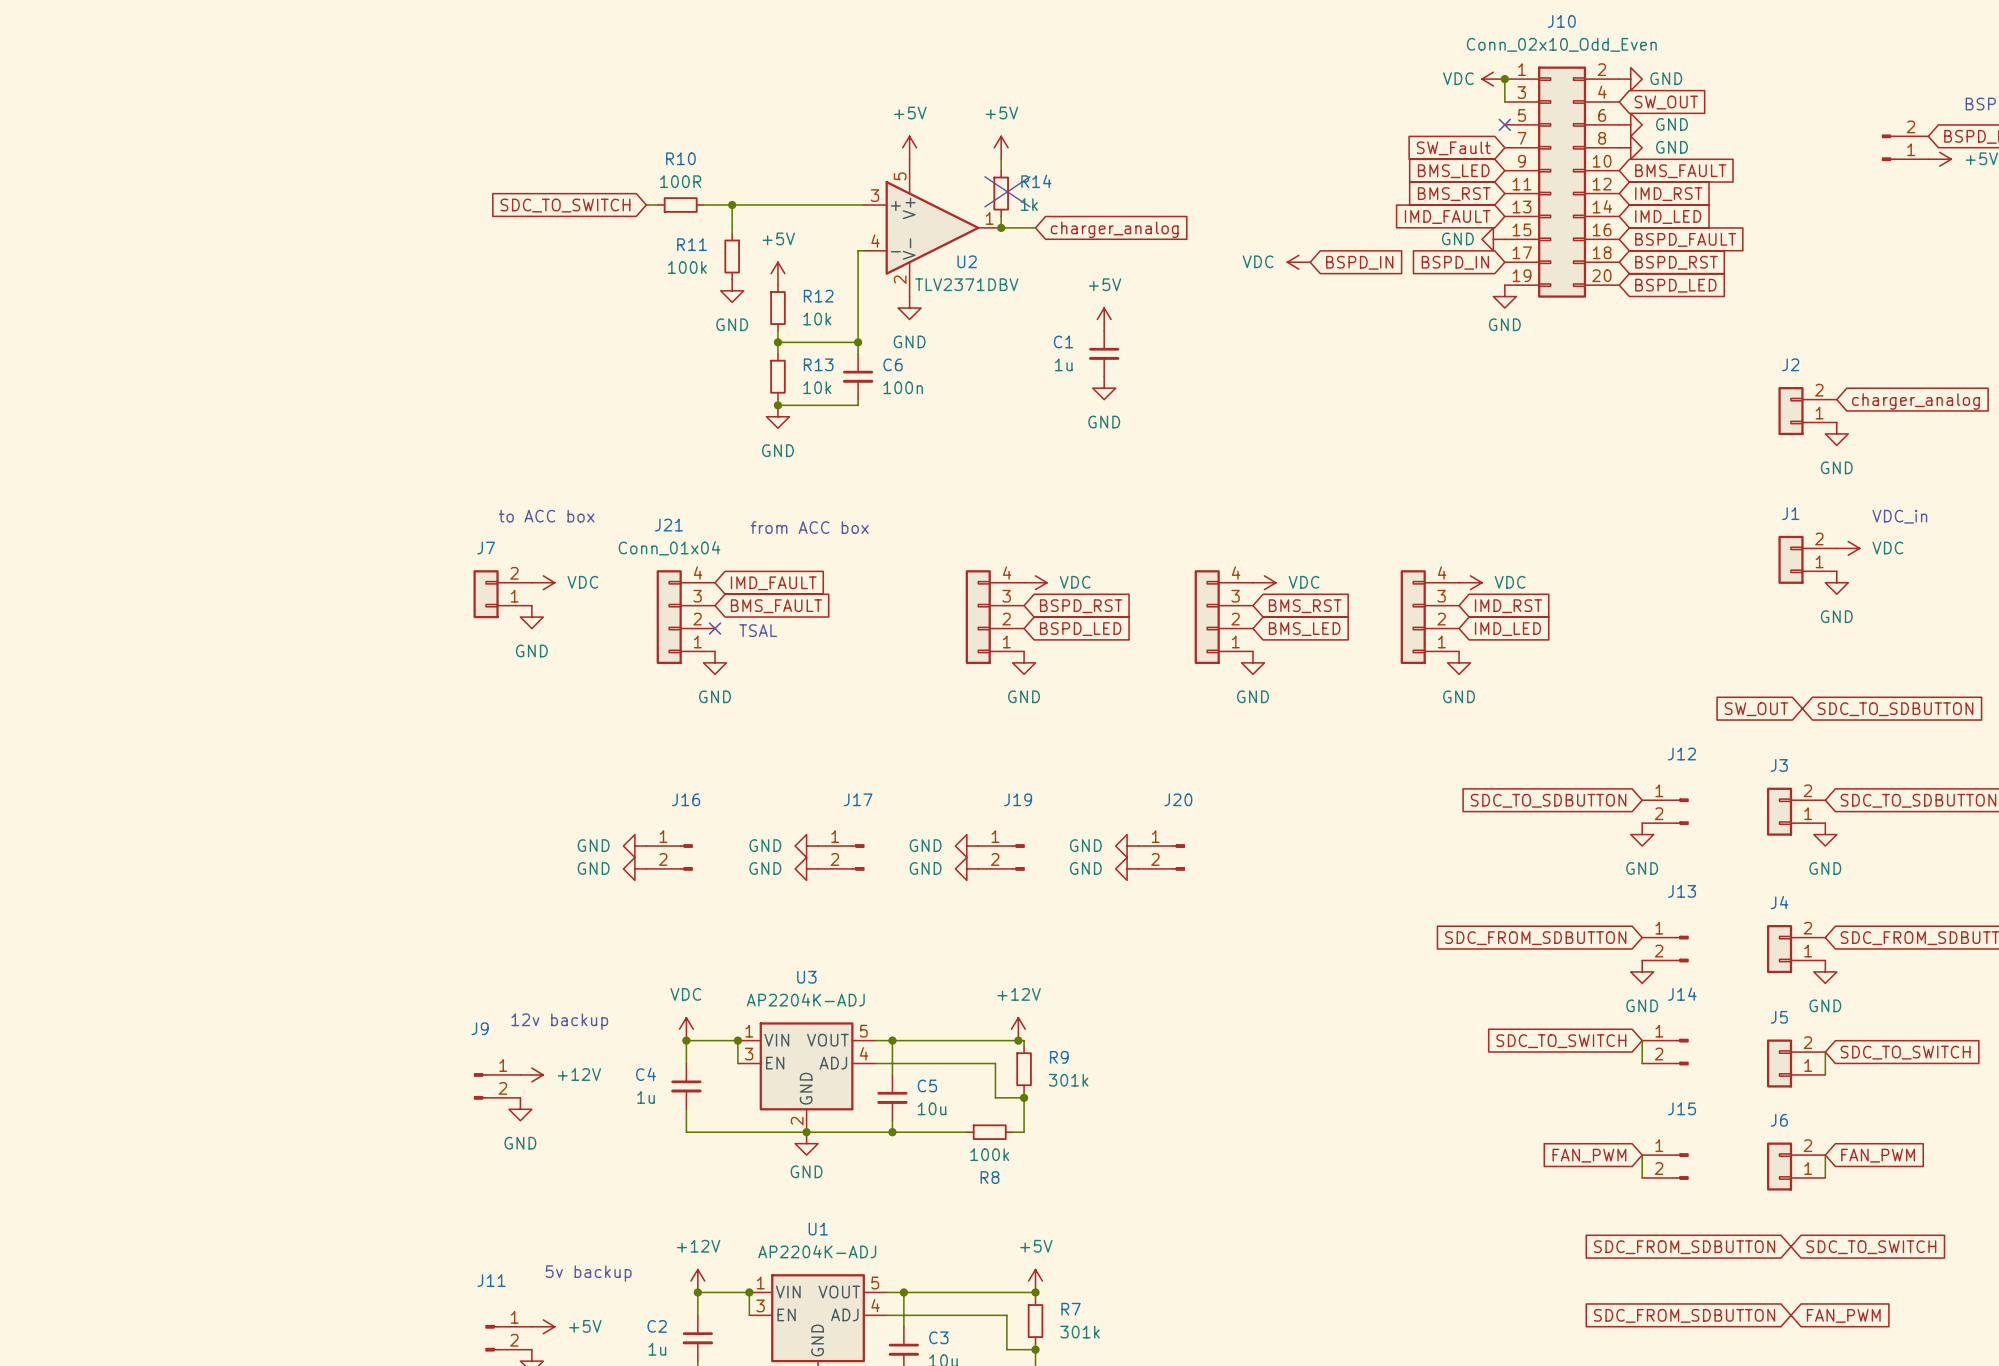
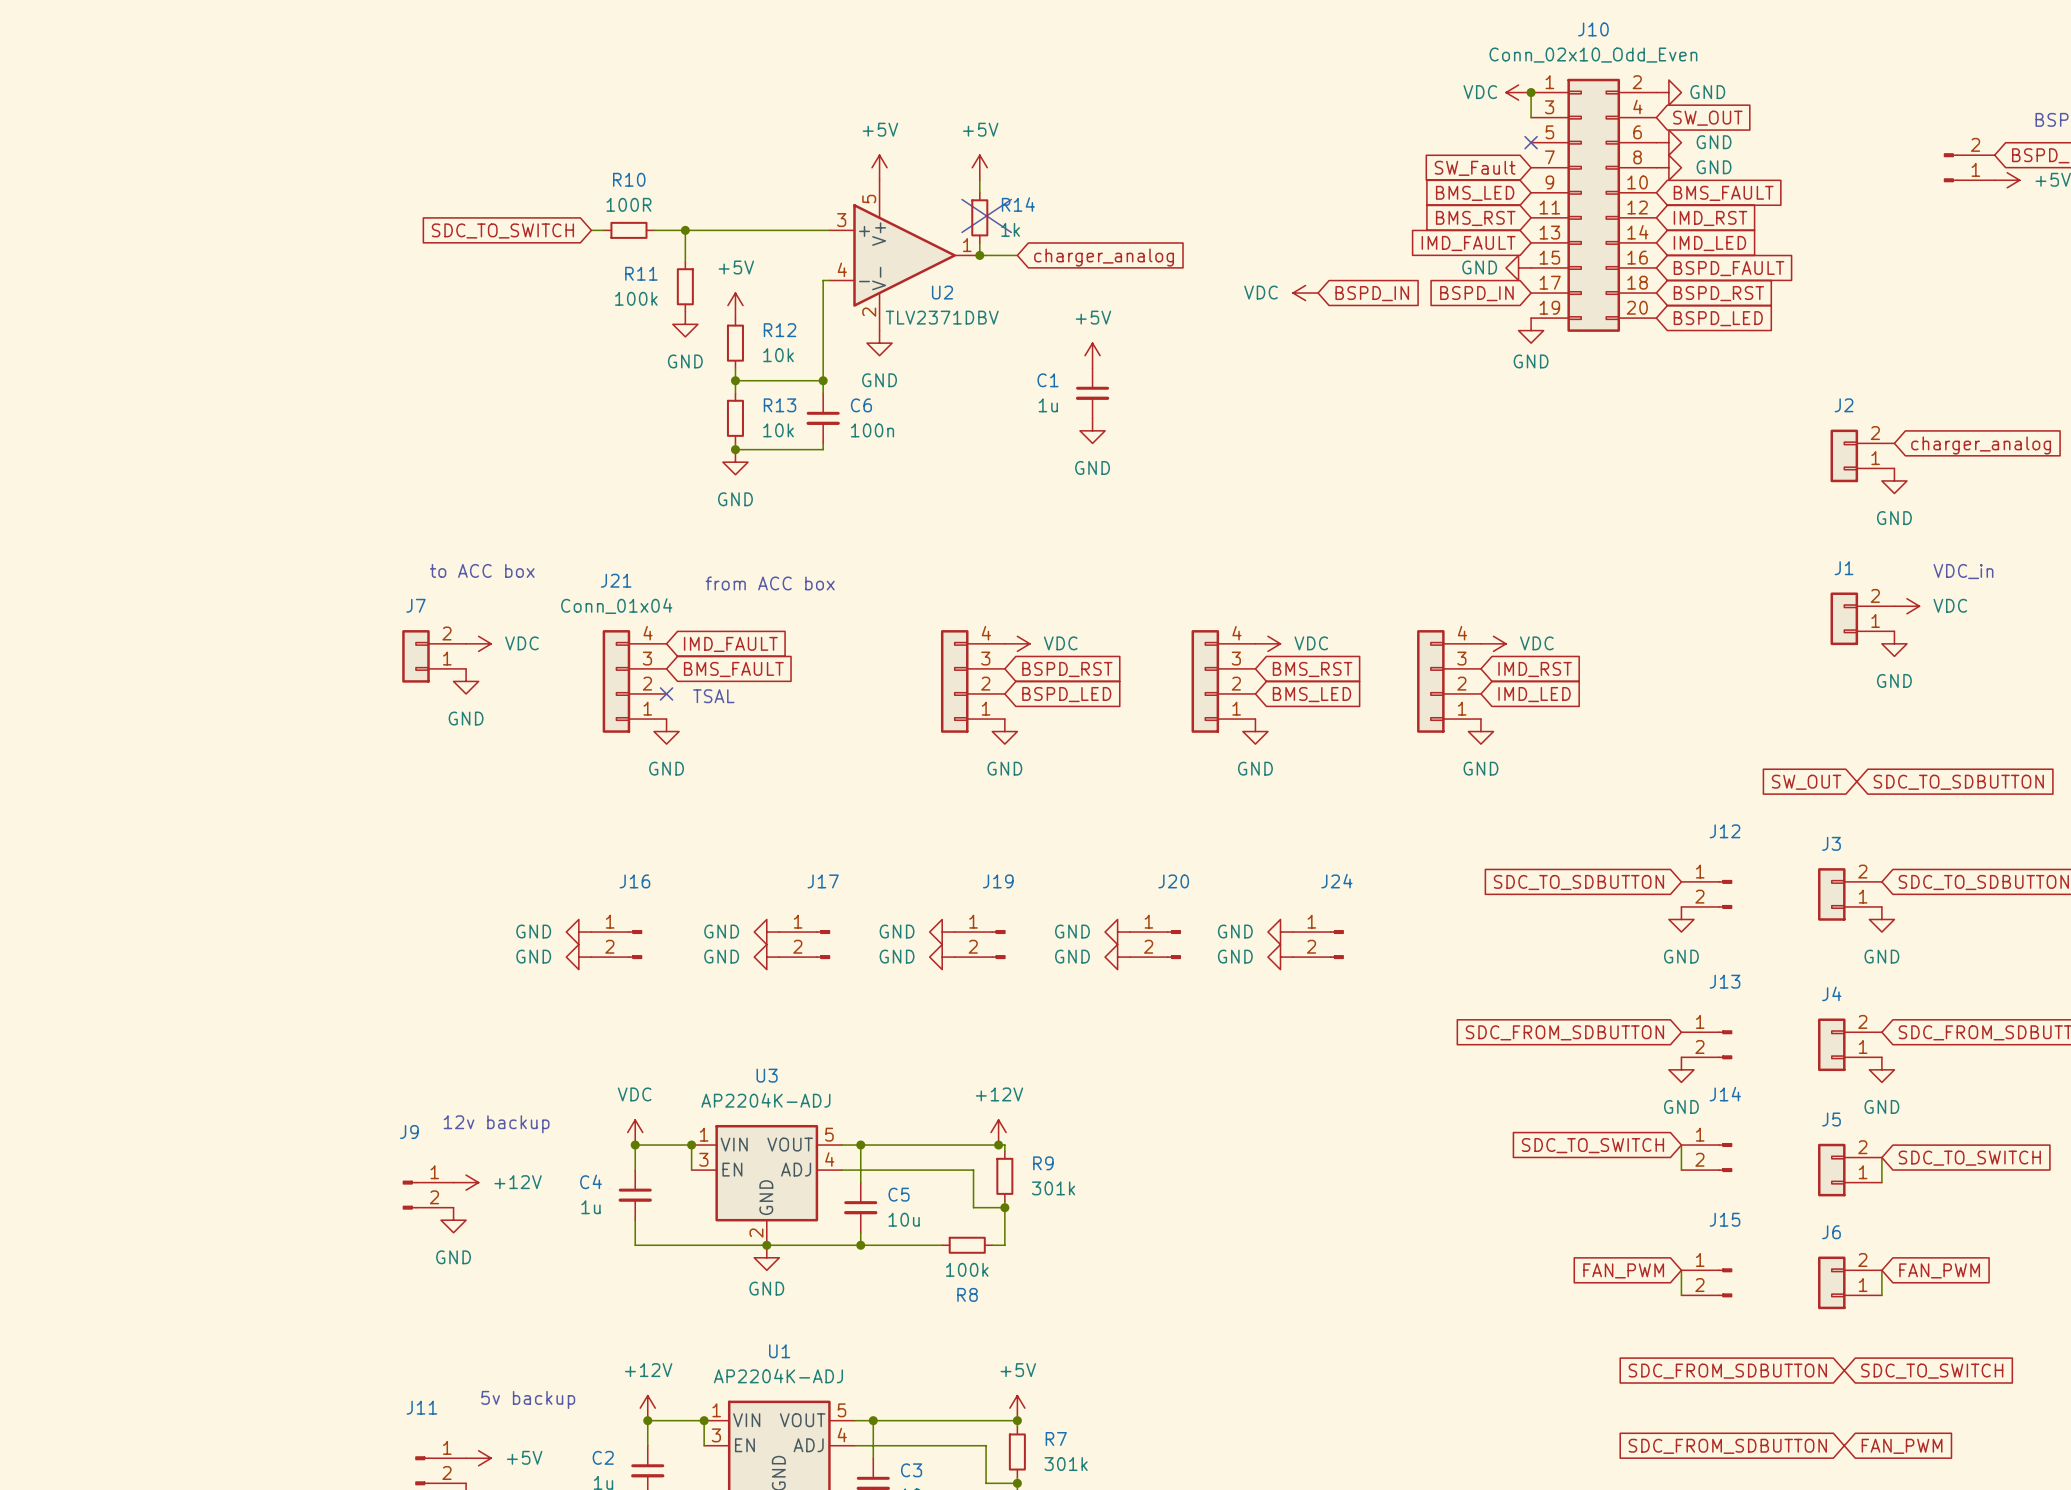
power symbol: none -> GND (1280, 932)
J24: none -> (1318, 944)
power symbol: none -> GND (1280, 957)

